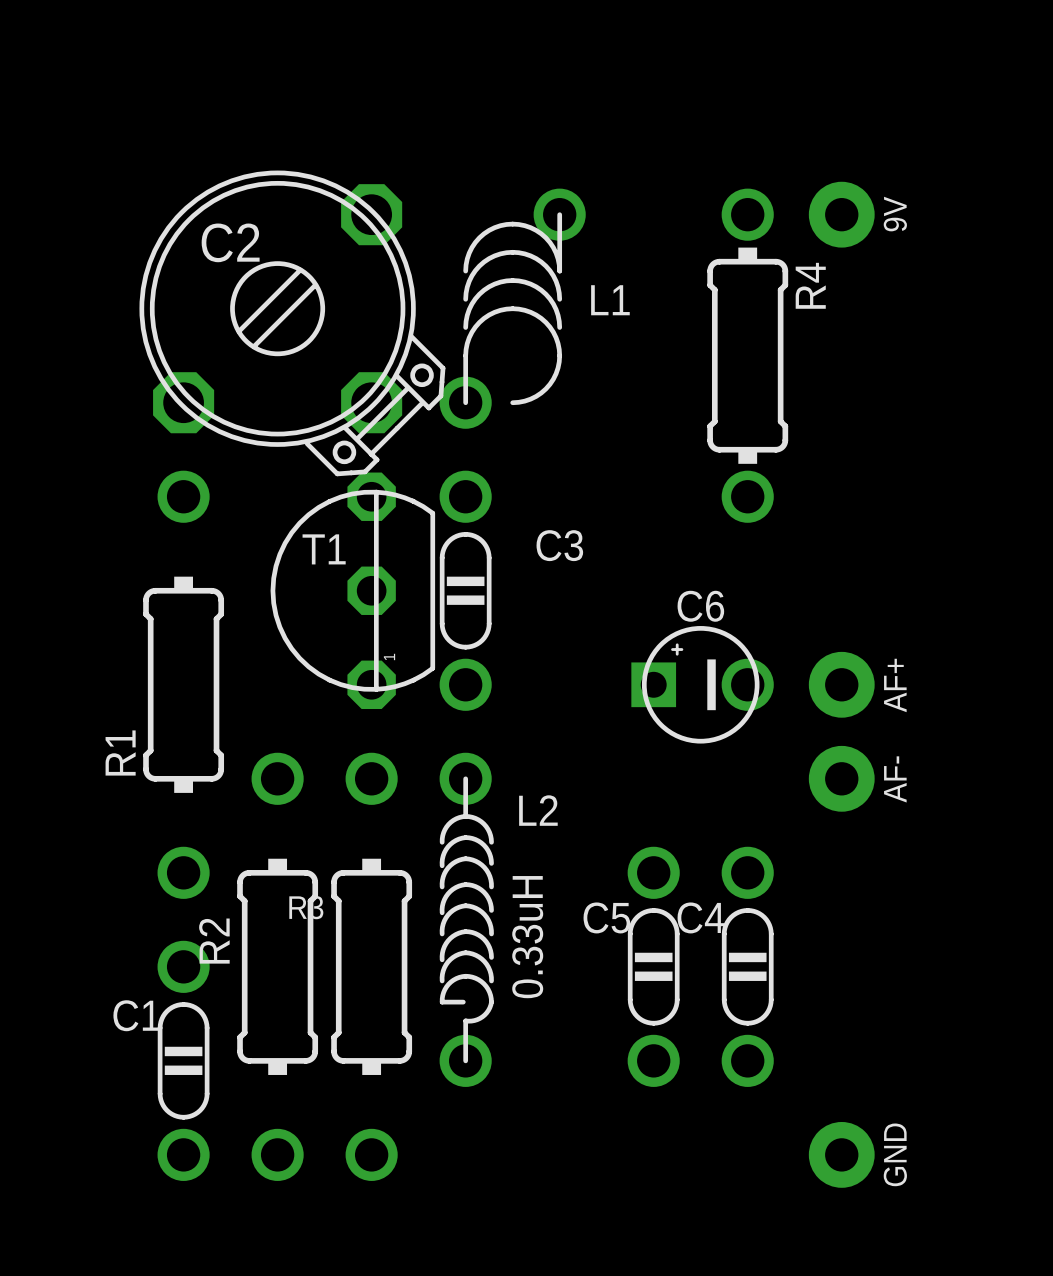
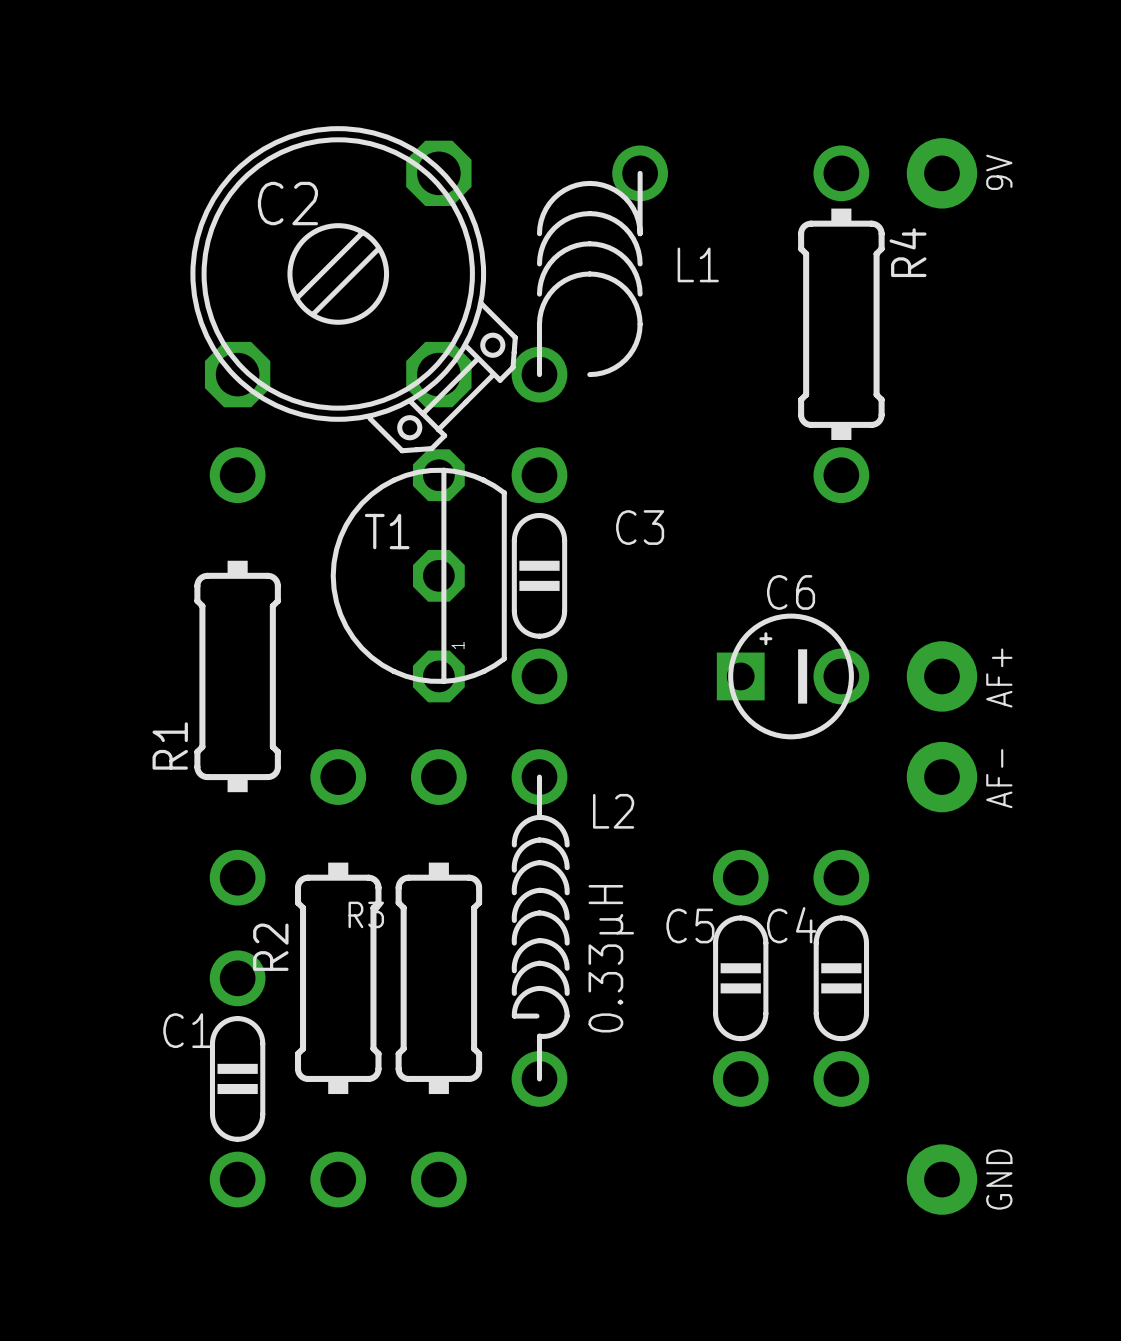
L2 value: 0.33uH (527, 937) -> 0.33μH (611, 958)

